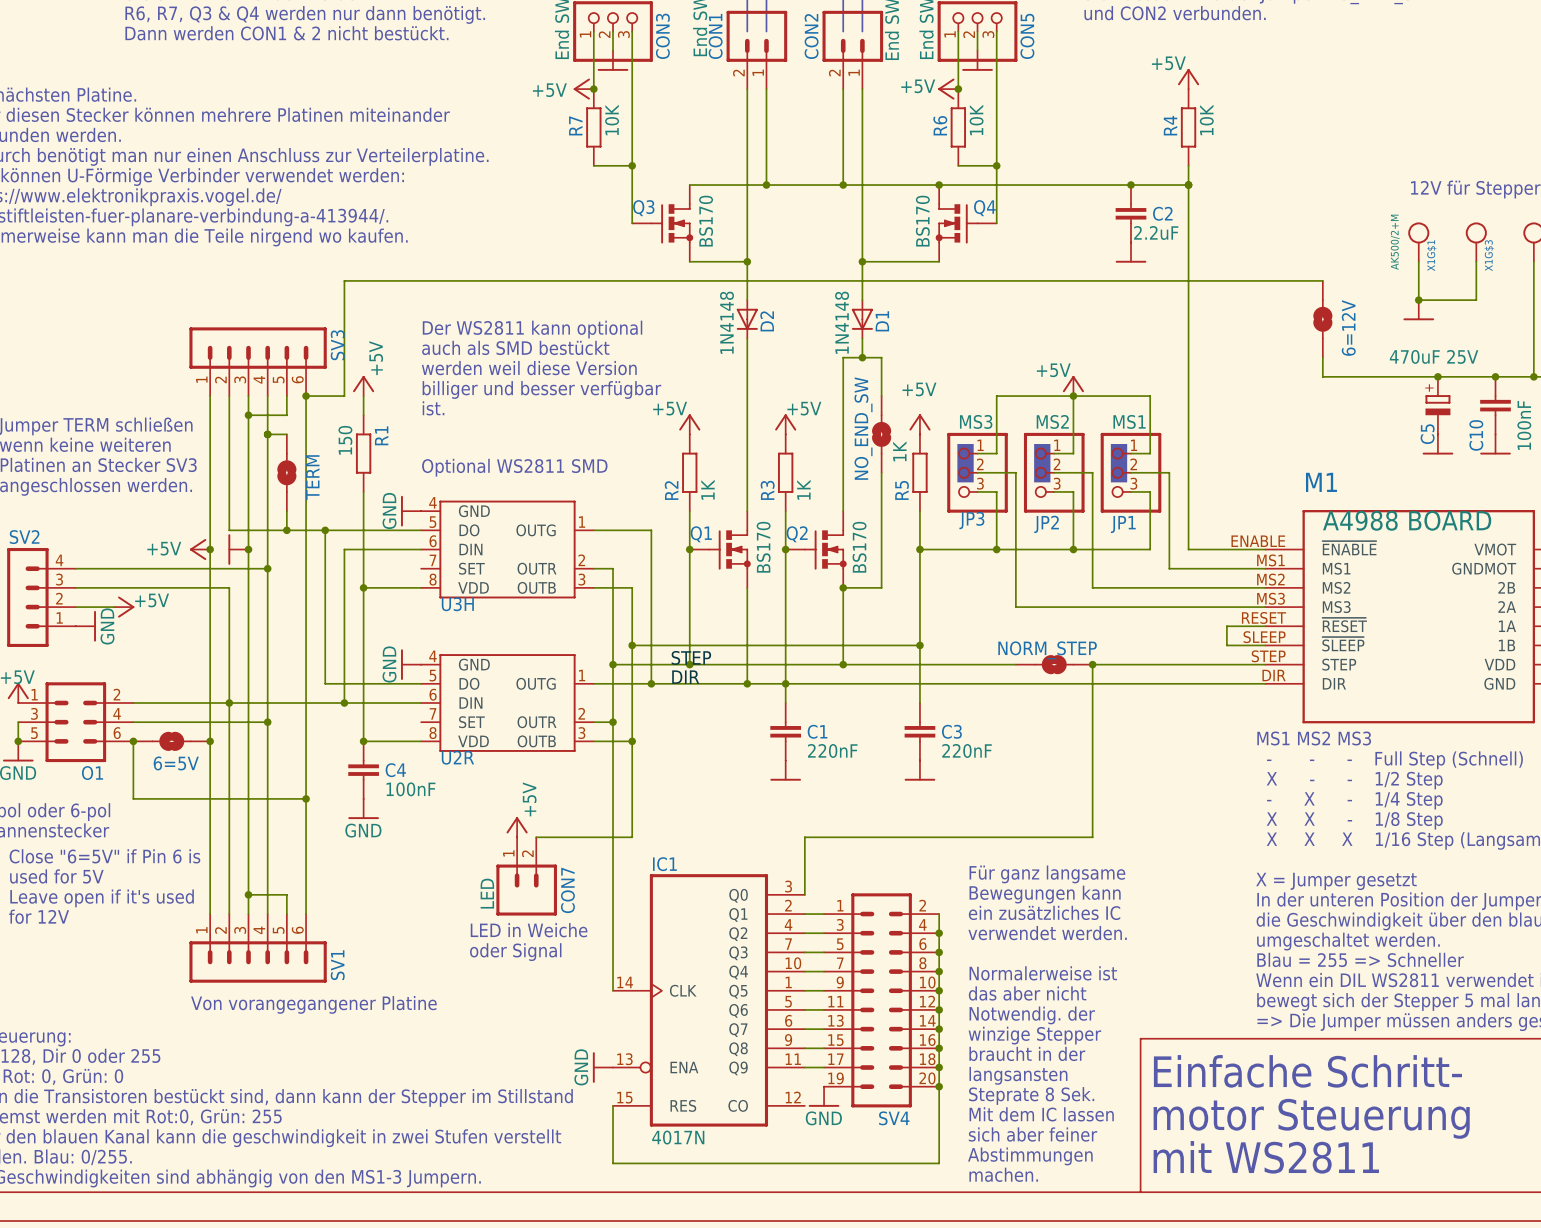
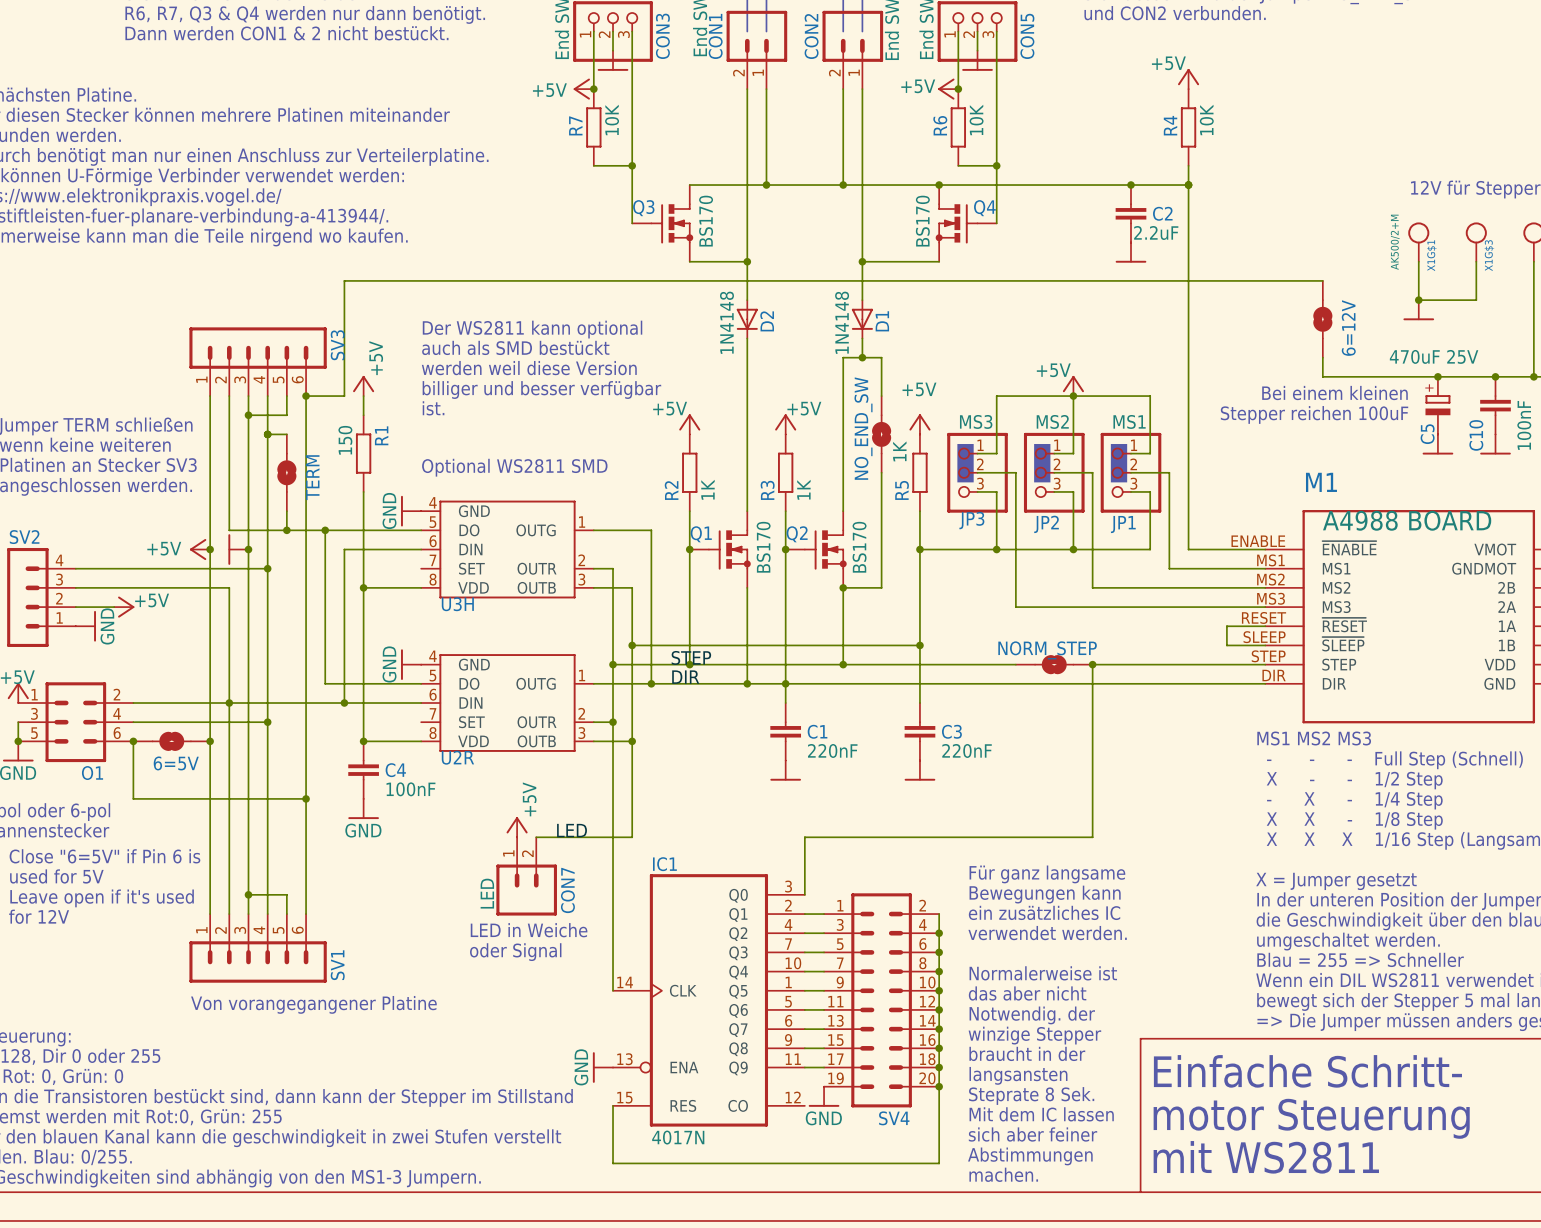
text: none -> Bei einem kleinen (1334, 393)
text: none -> Stepper reichen 100uF (1314, 414)
label: none -> LED (572, 830)

